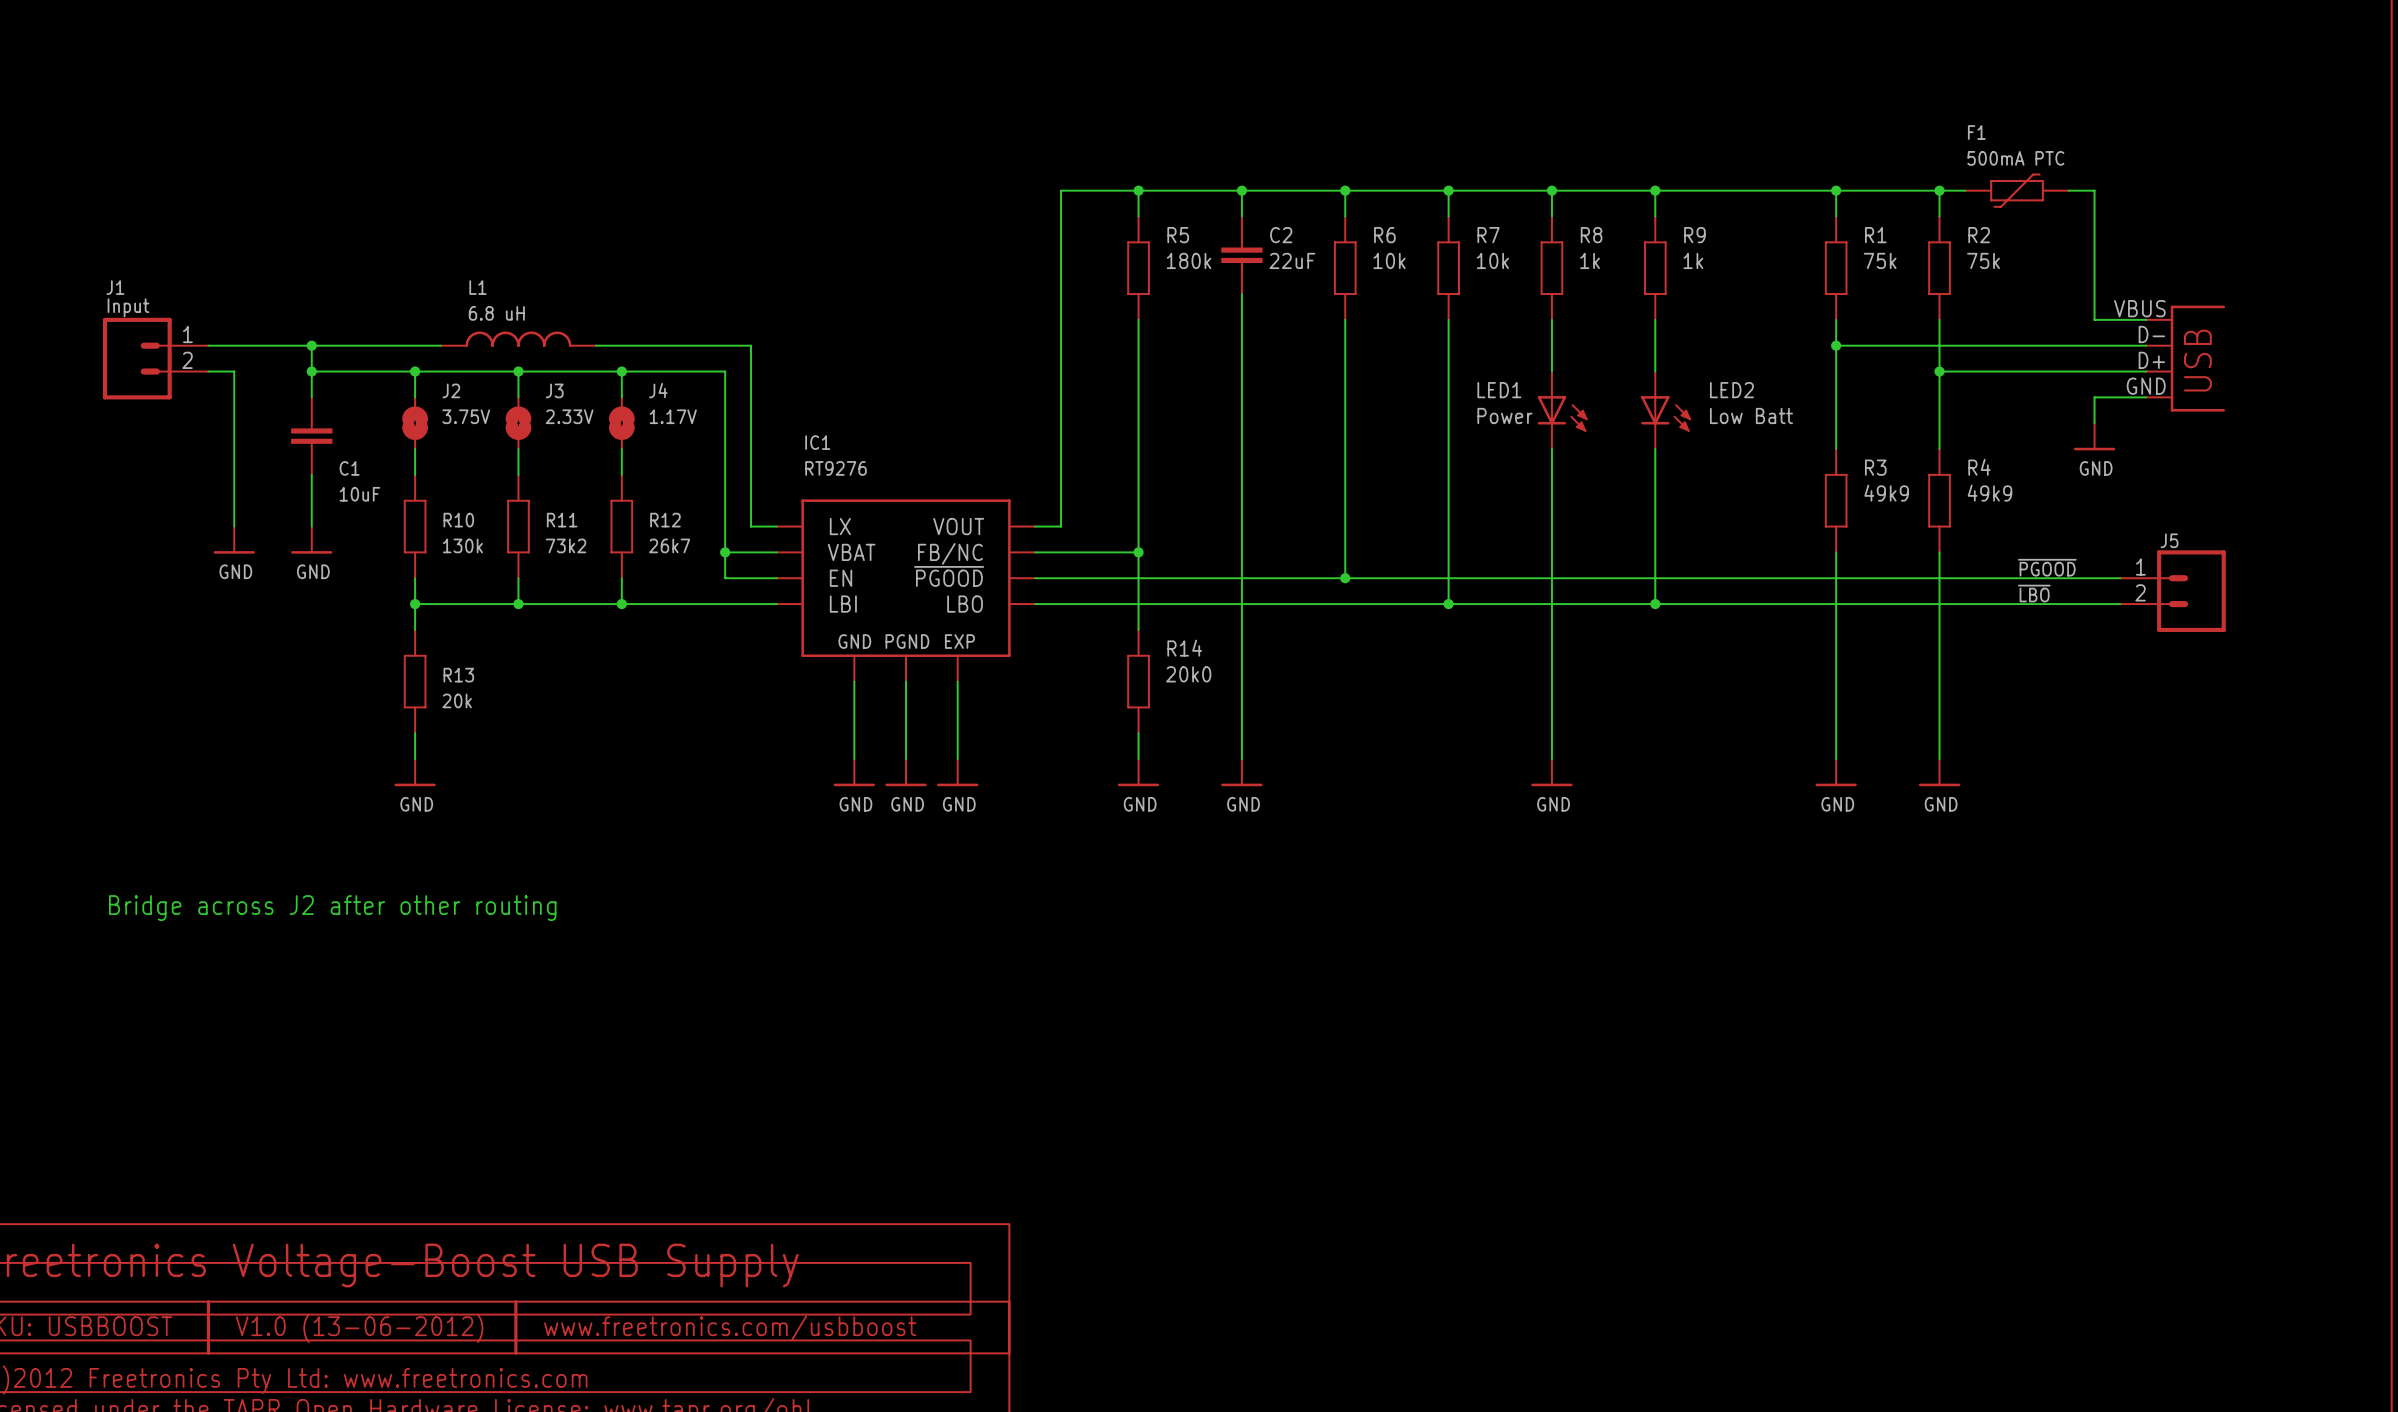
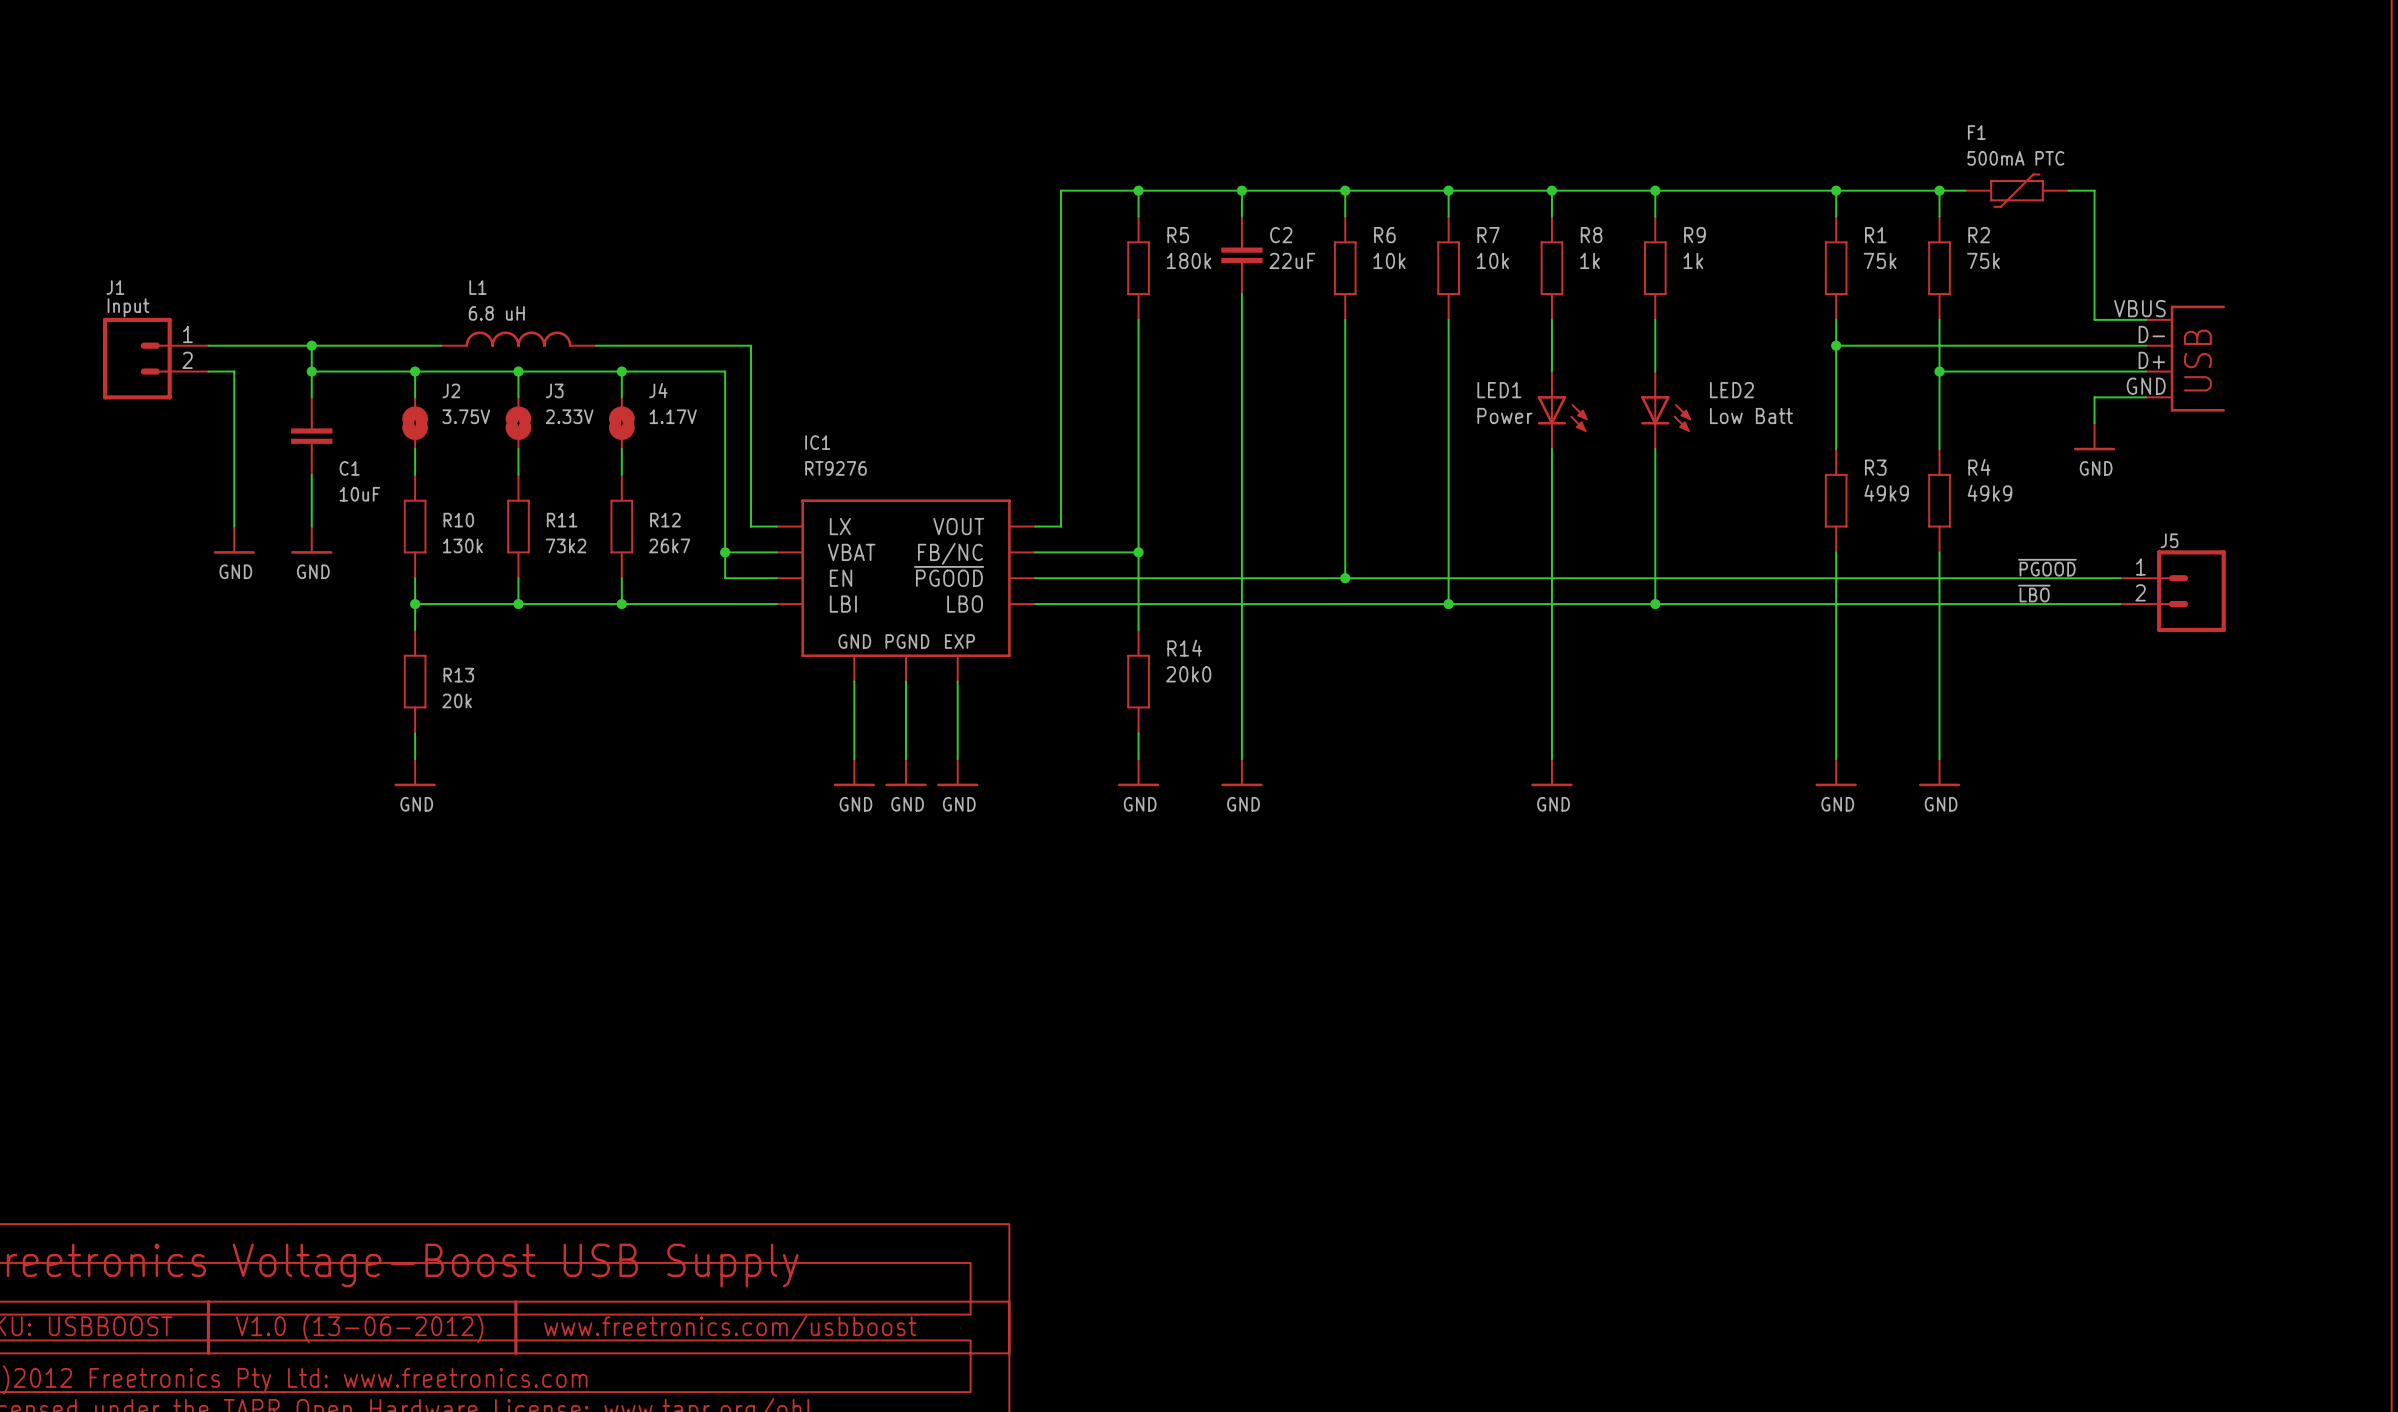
text: Bridge across J2 after other routing (332, 908) -> none

